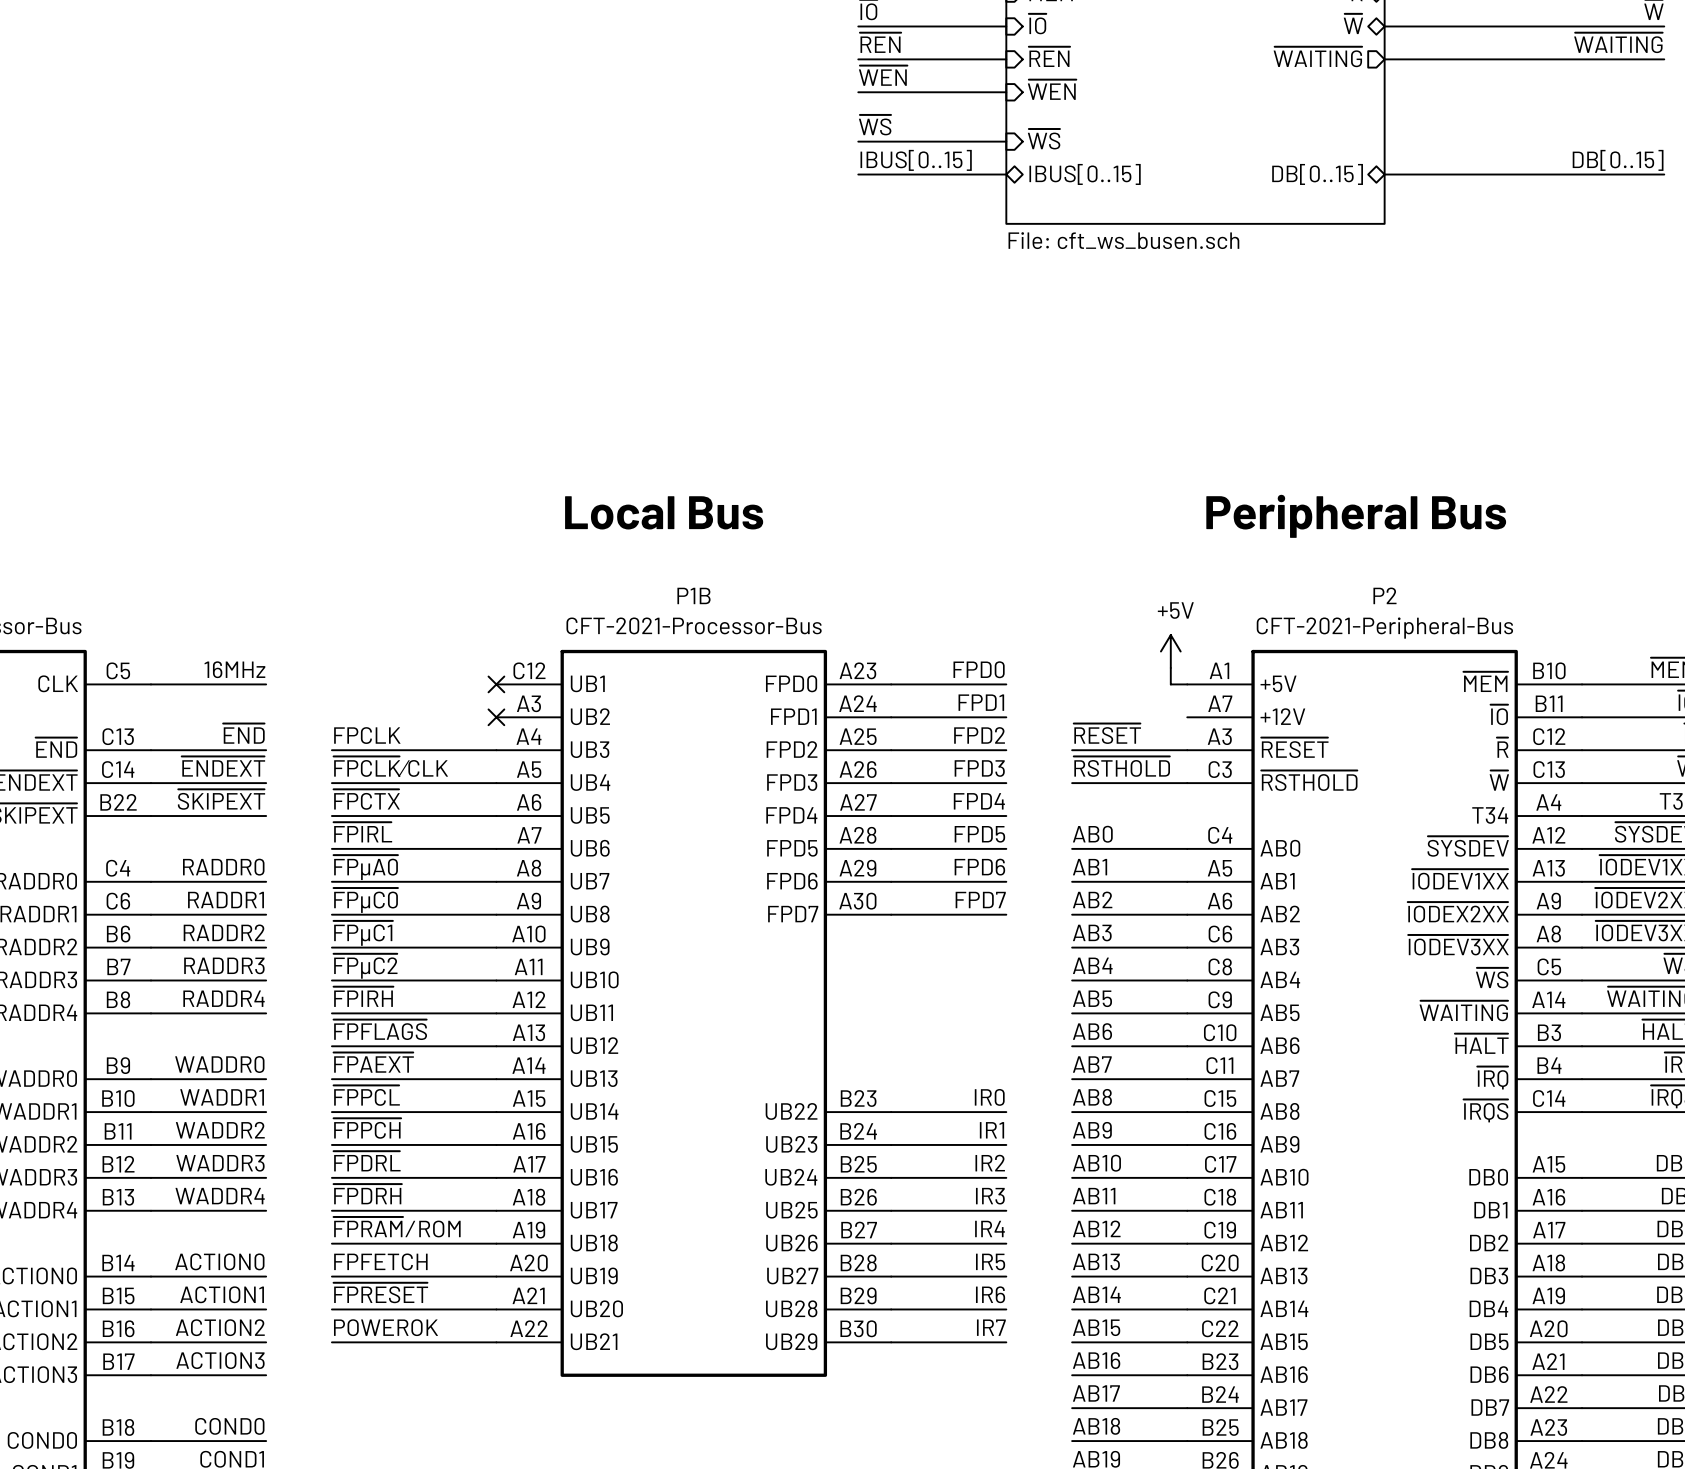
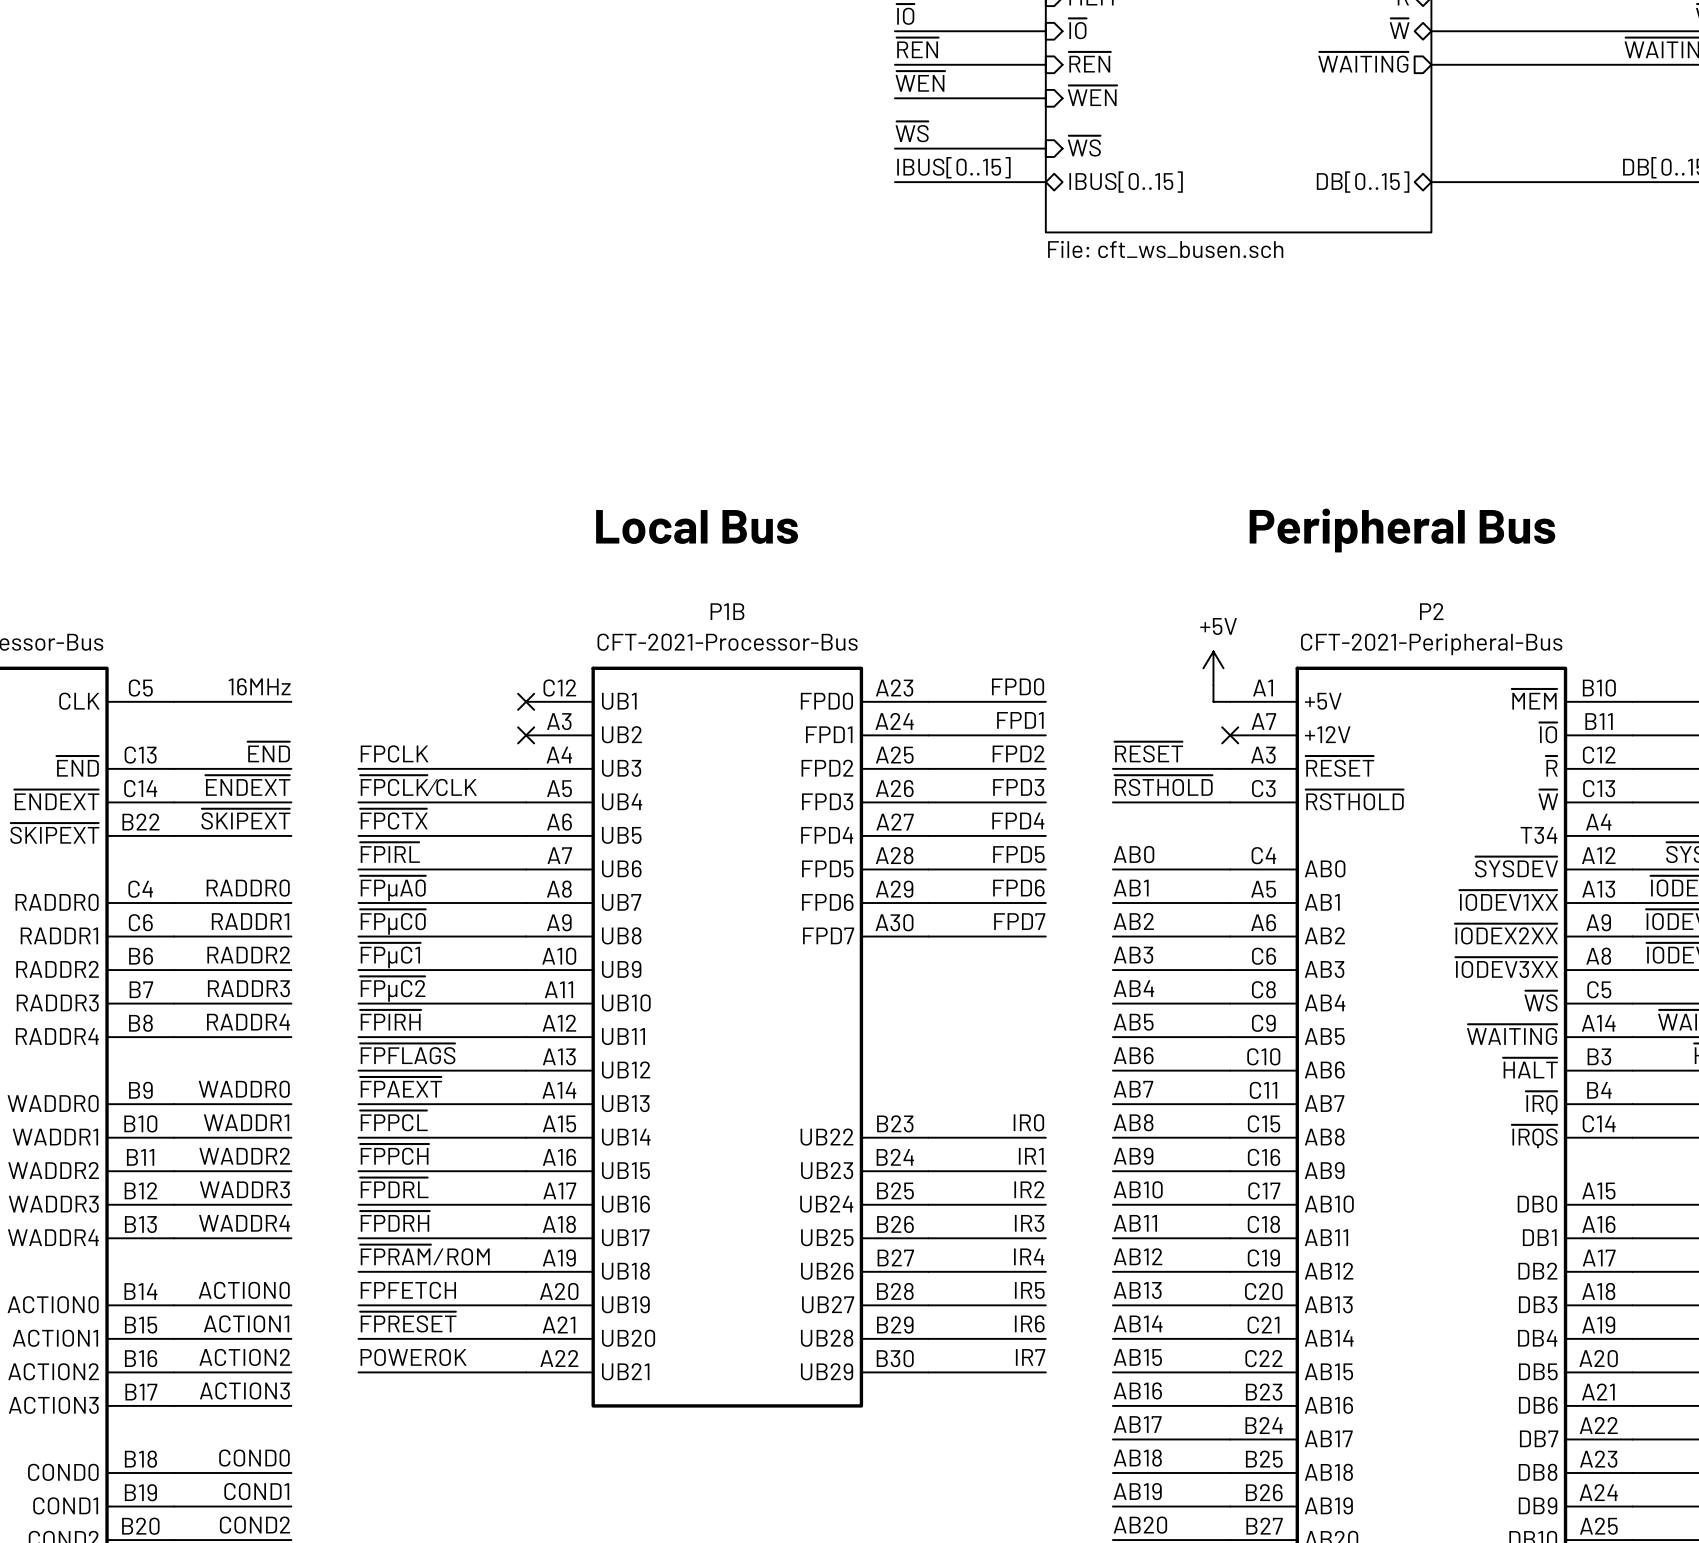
no-connect mark: none -> (1230, 735)

